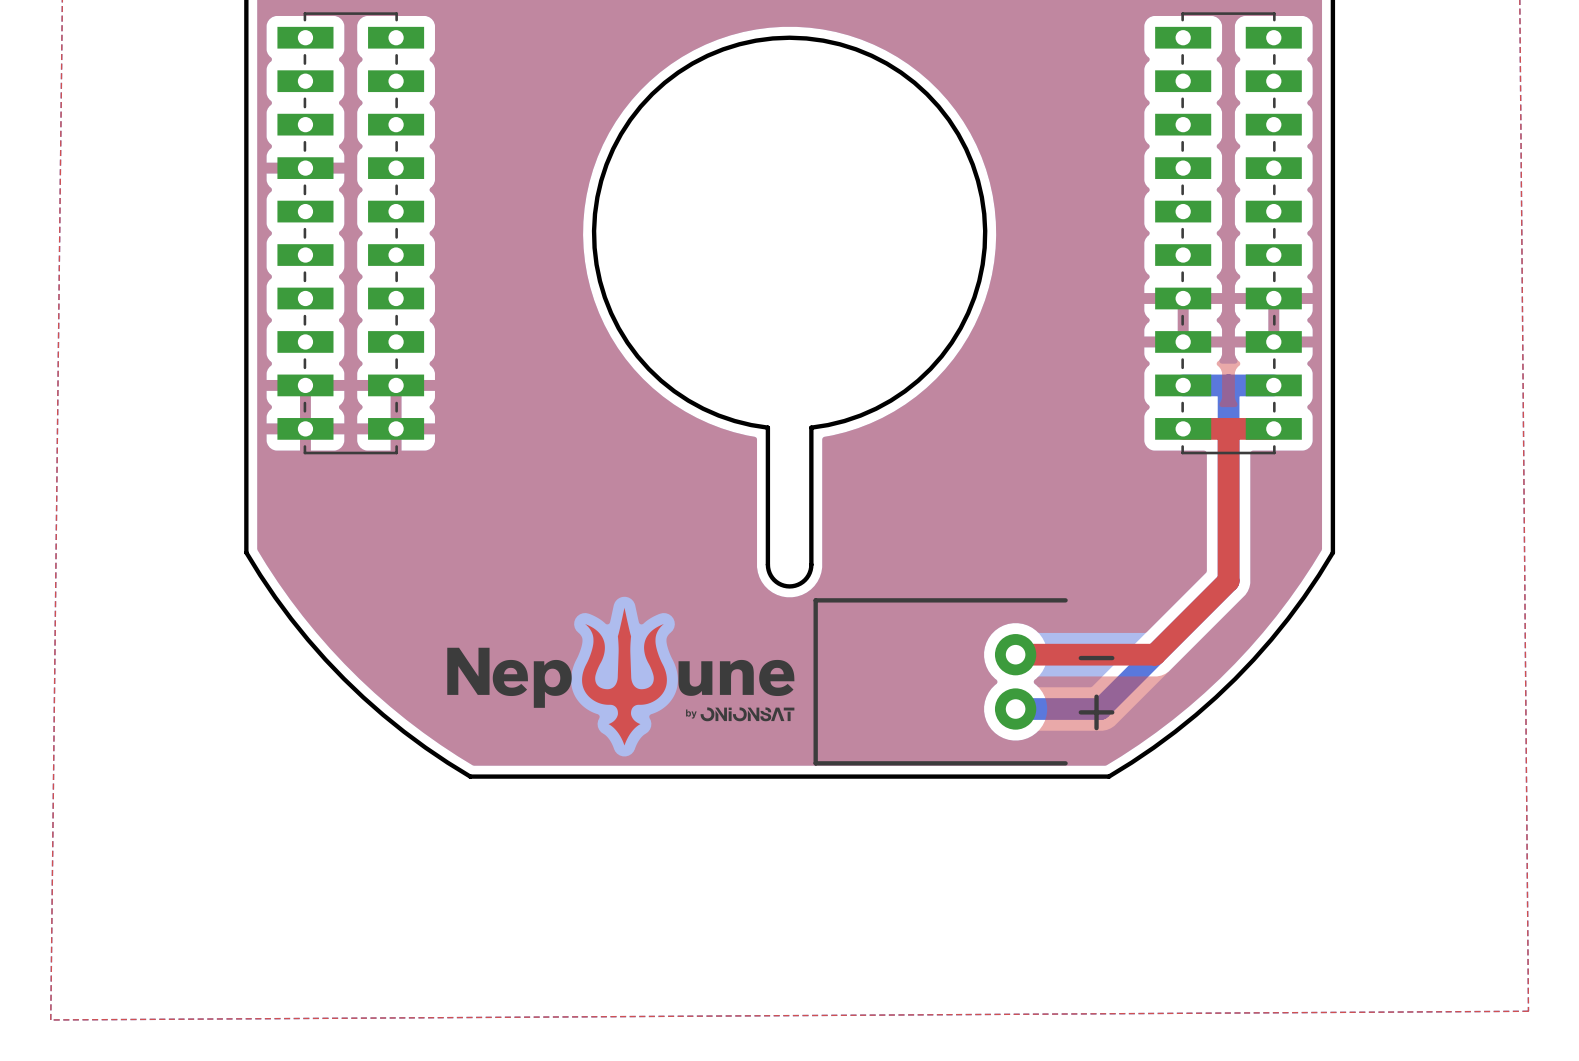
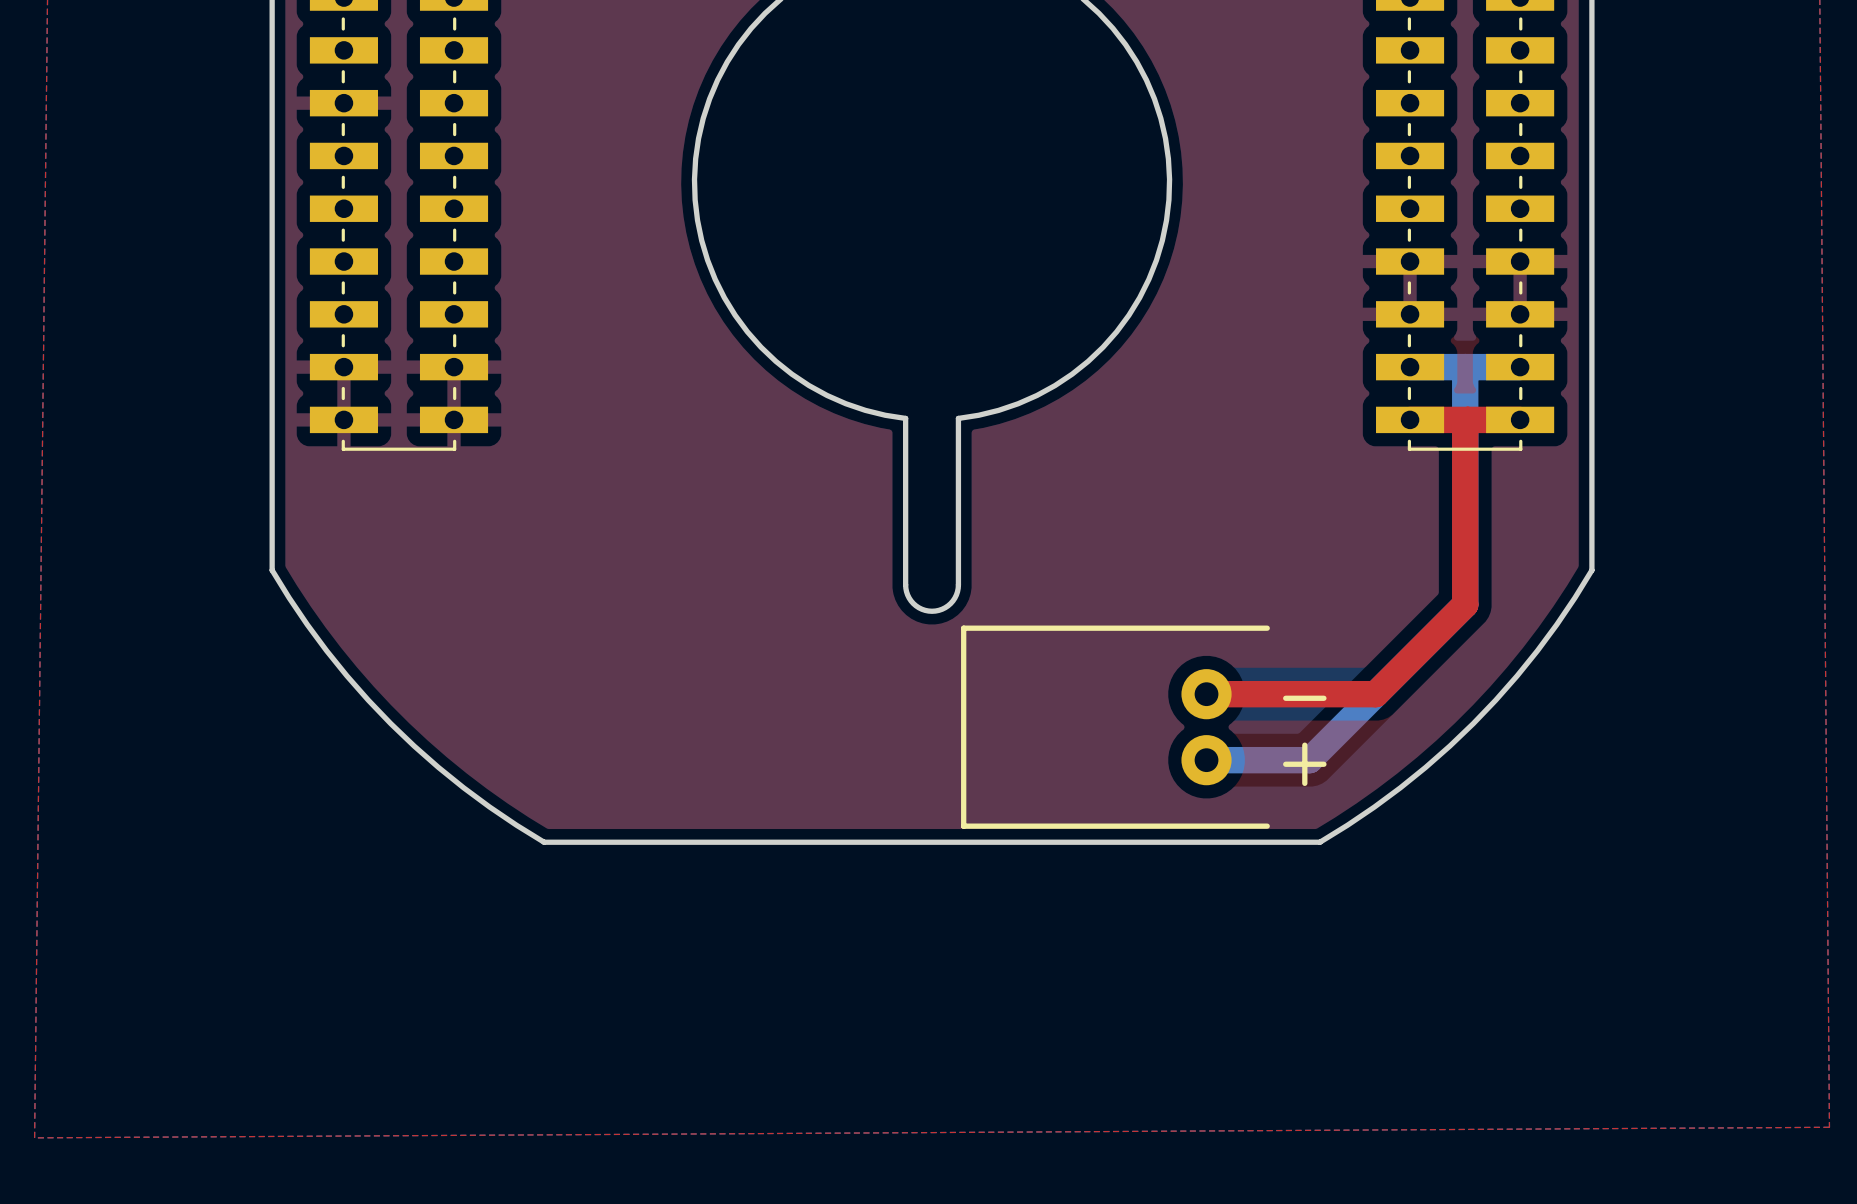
drawing: [447, 607, 795, 746] -> none

